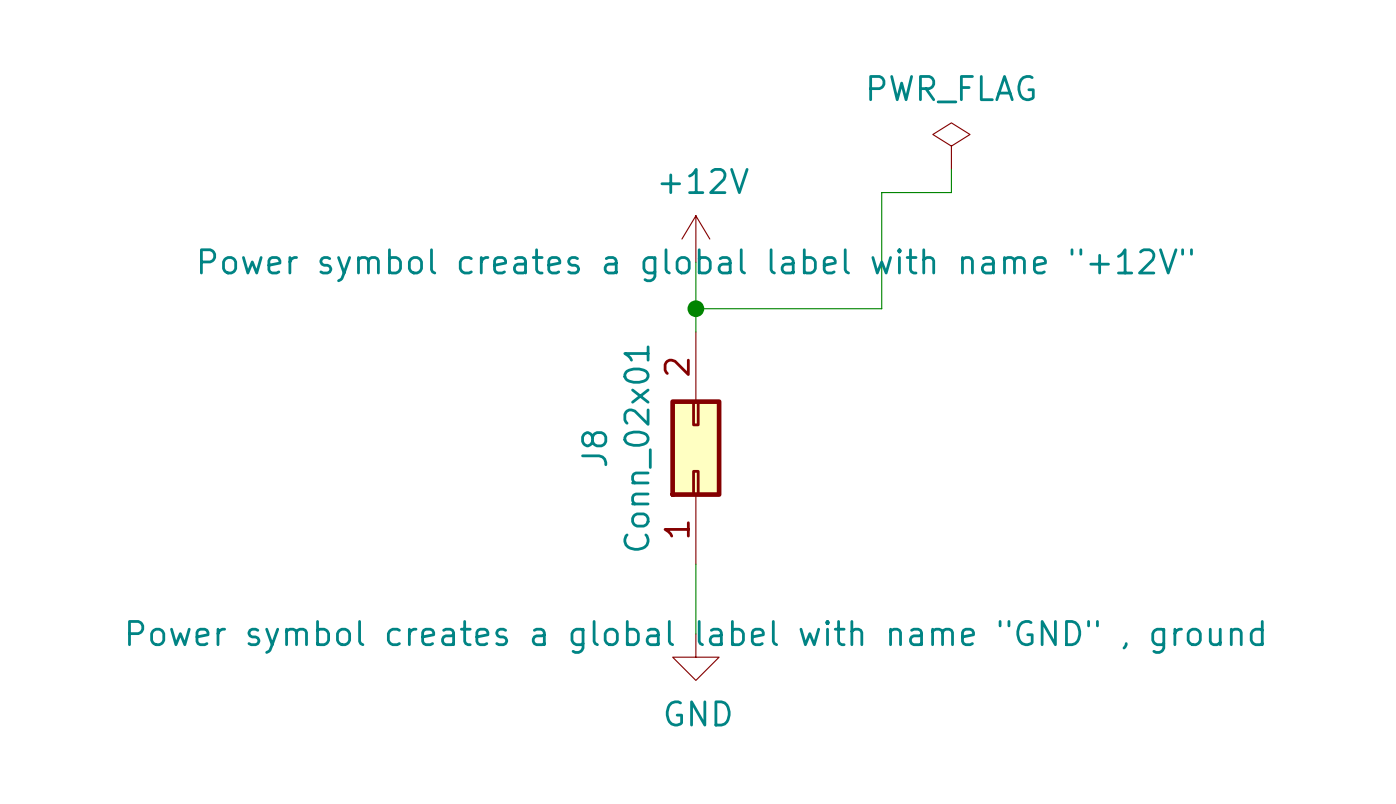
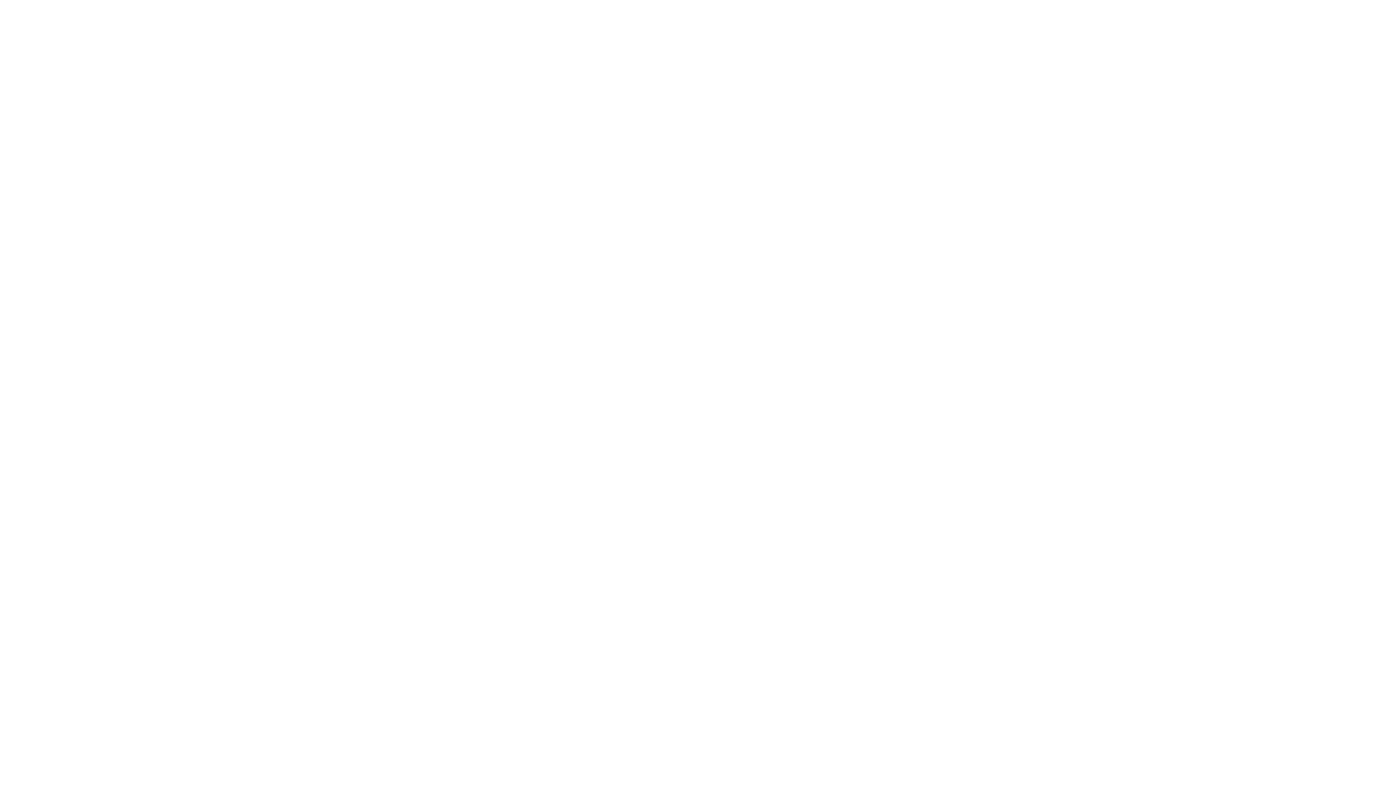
power symbol: PWR_FLAG (951, 146) -> none
wire: (951, 169) (951, 192) (881, 192) (881, 308) (695, 308) -> none
power symbol: +12V (695, 239) -> none
wire: (695, 262) (695, 331) -> none
junction: (695, 308) -> none
J8: Conn_02x01 (695, 448) -> none
wire: (695, 564) (695, 633) -> none
power symbol: GND (695, 657) -> none

